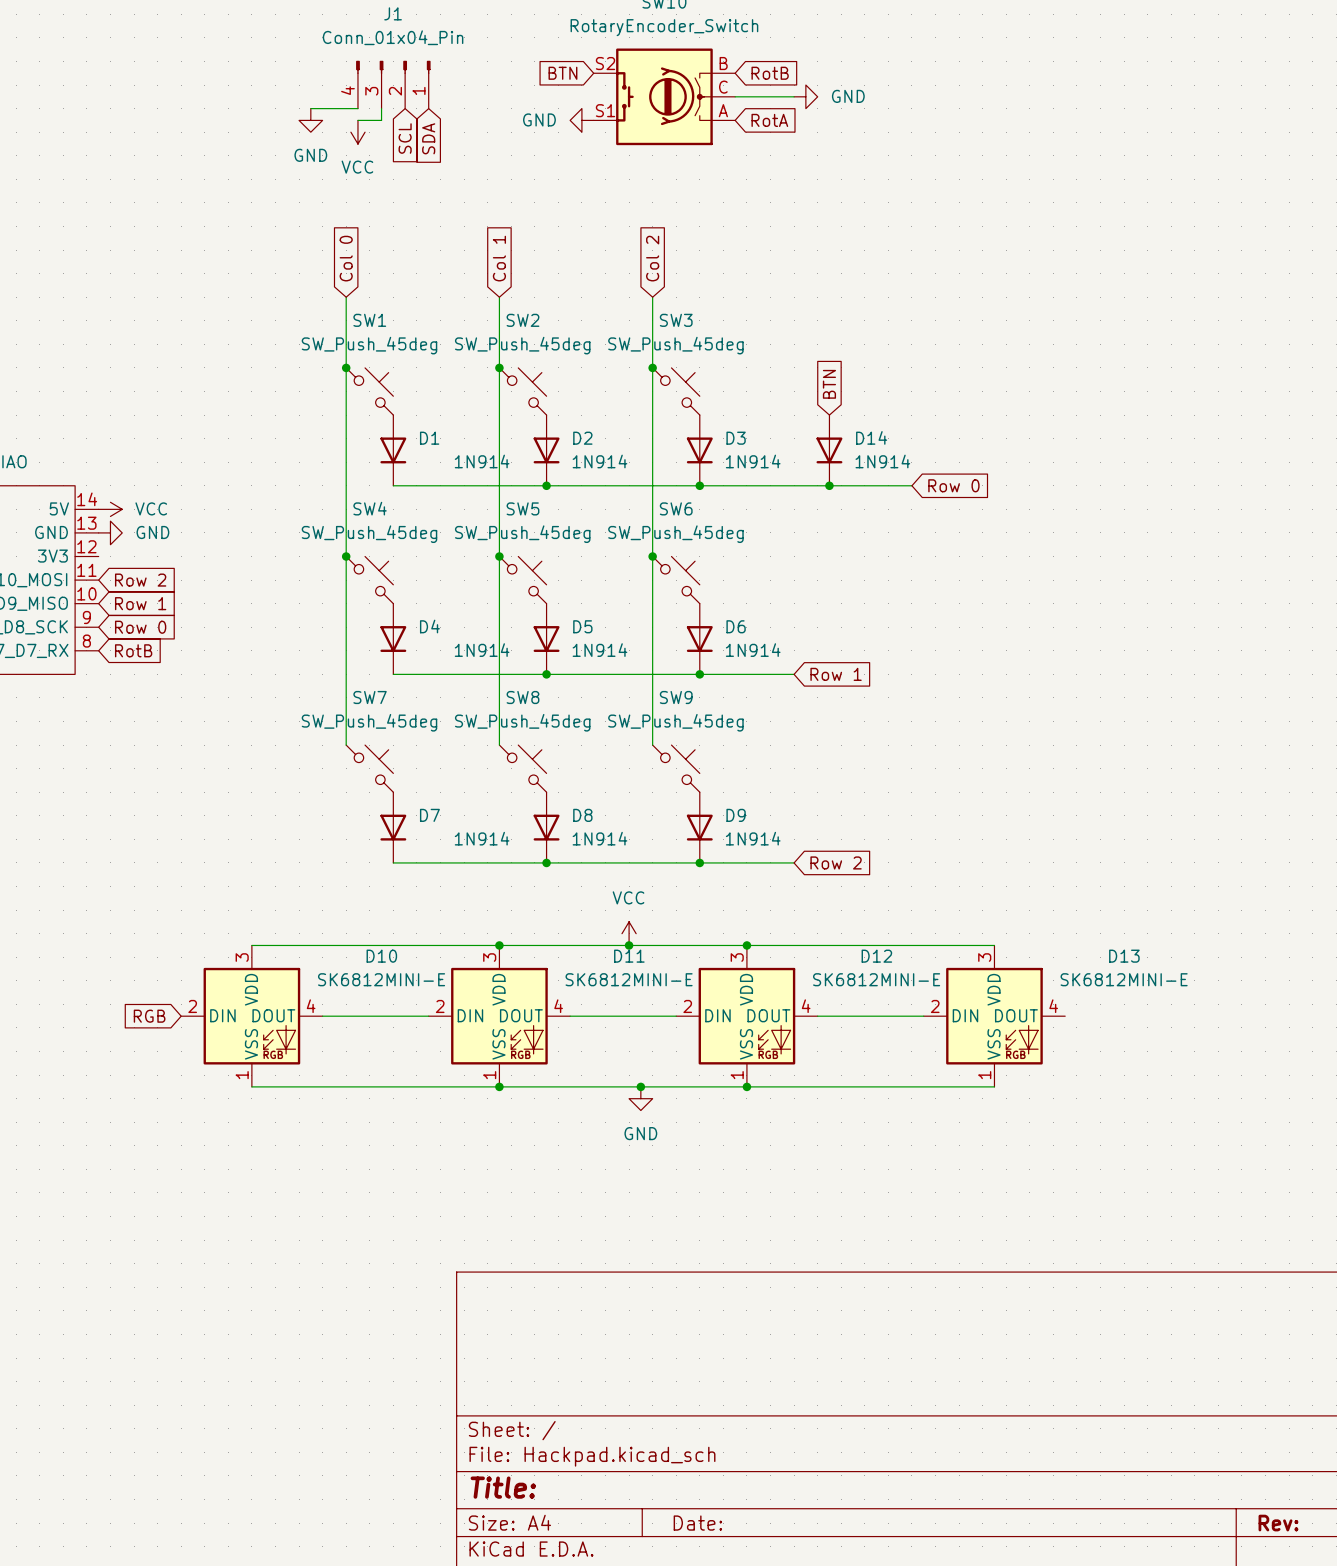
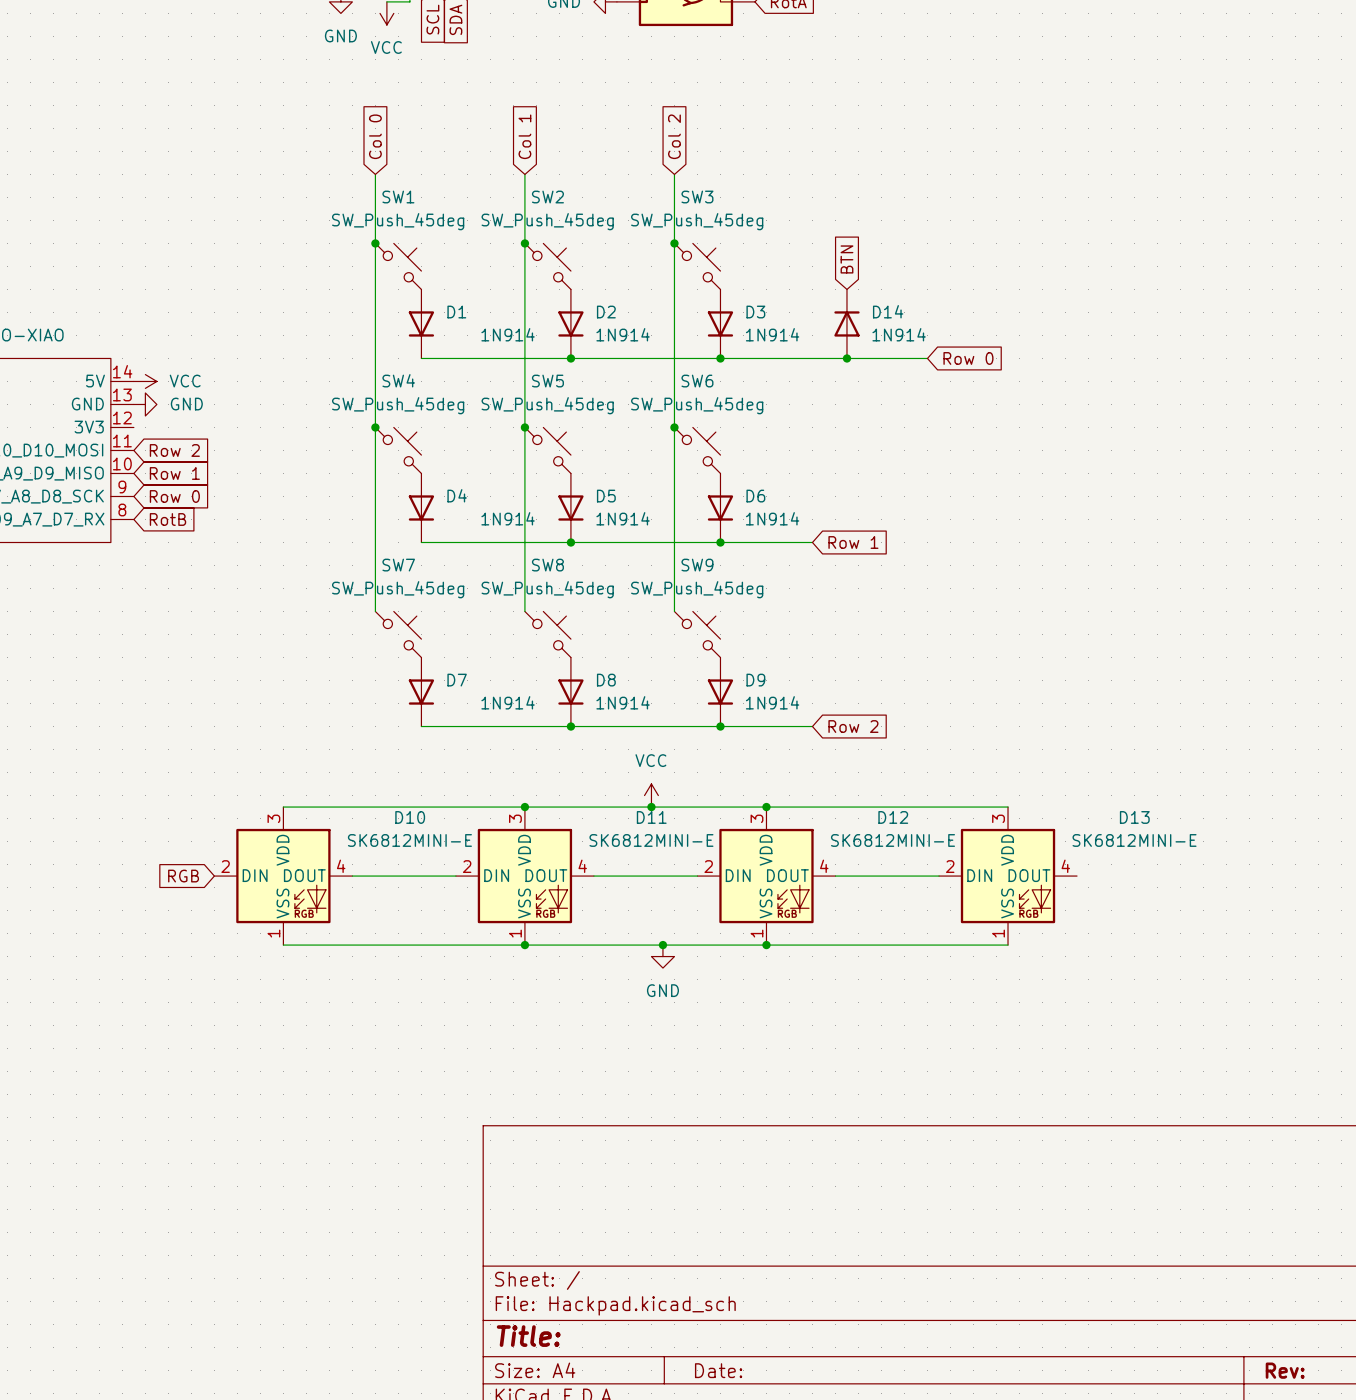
D14 rotation: 0° (829, 450) -> 180° (846, 323)

